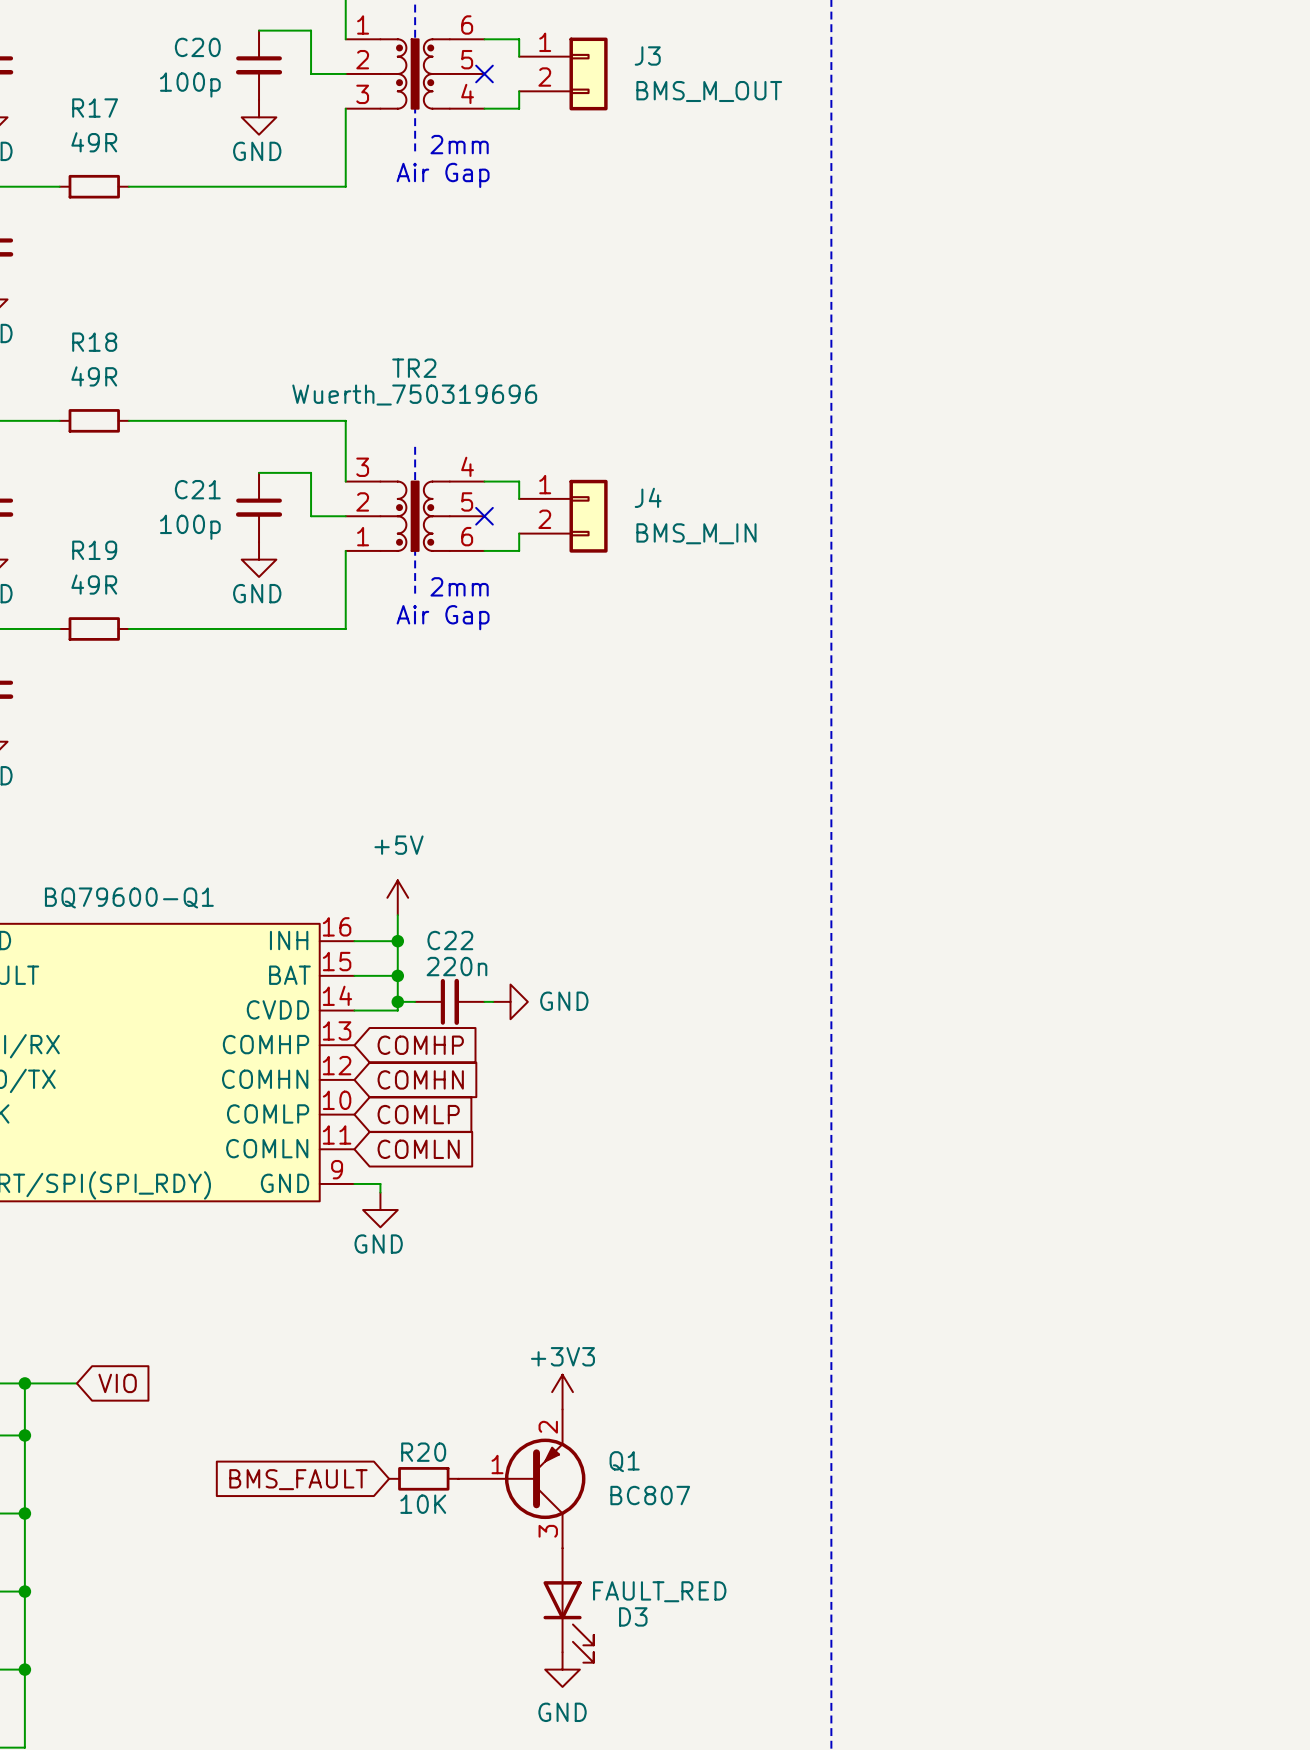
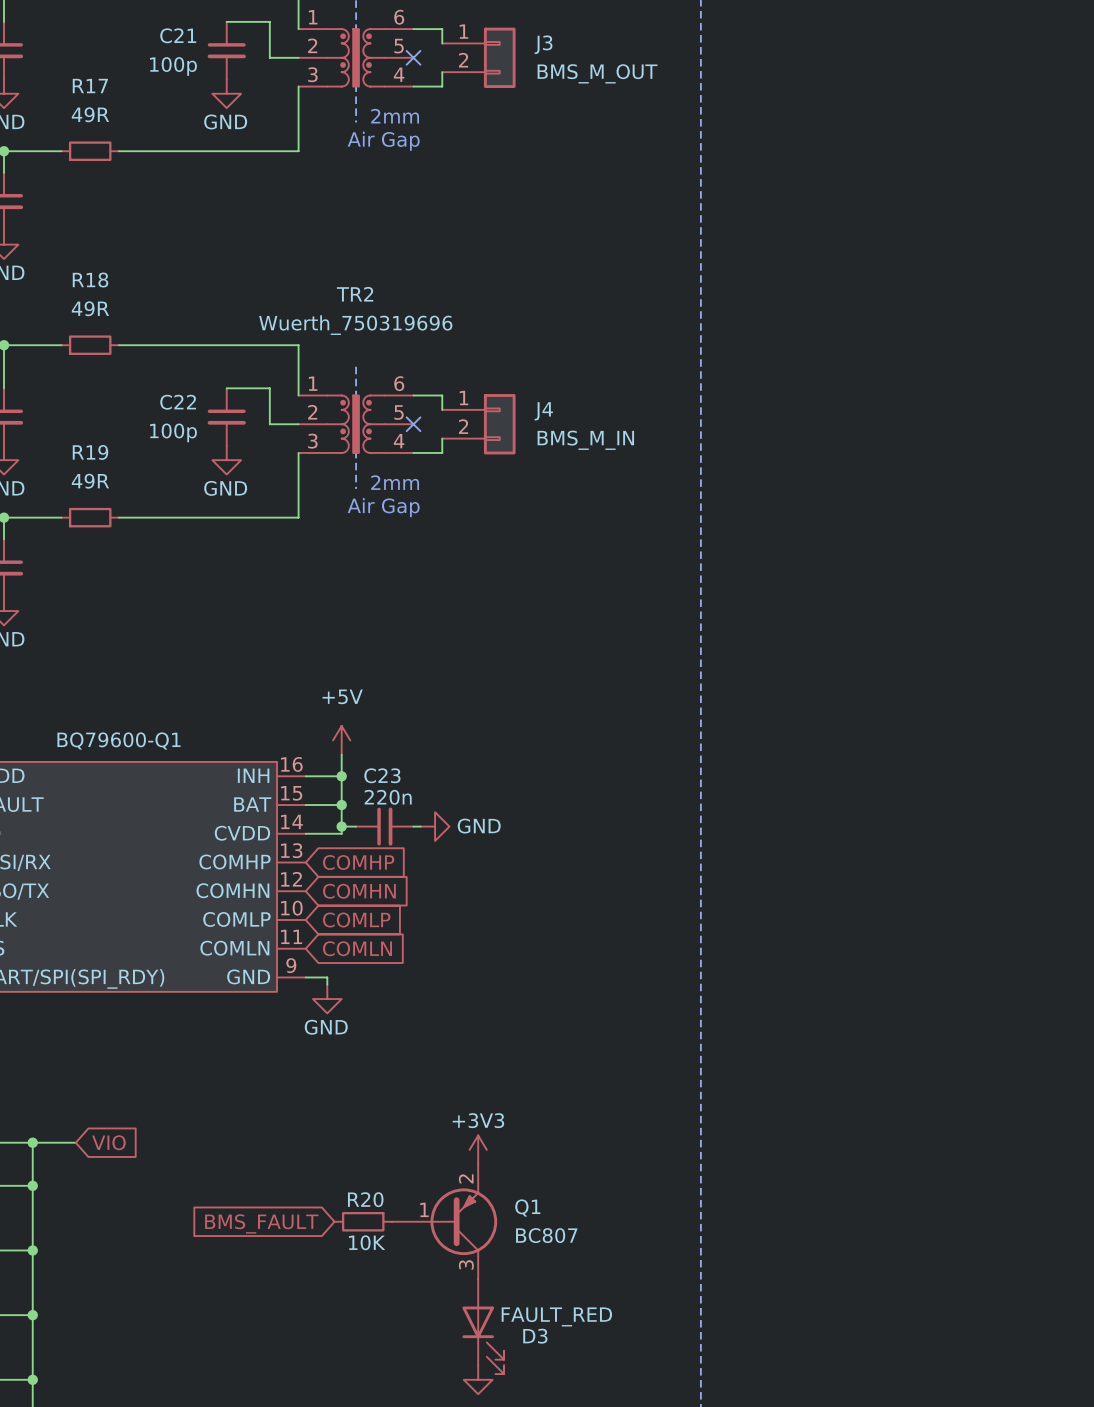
C20 name: C20 (197, 47) -> C21 (178, 35)
C21 name: C21 (197, 489) -> C22 (178, 402)
TR2 flip: as is (415, 516) -> up-down (356, 424)
C22 name: C22 (450, 940) -> C23 (382, 775)

